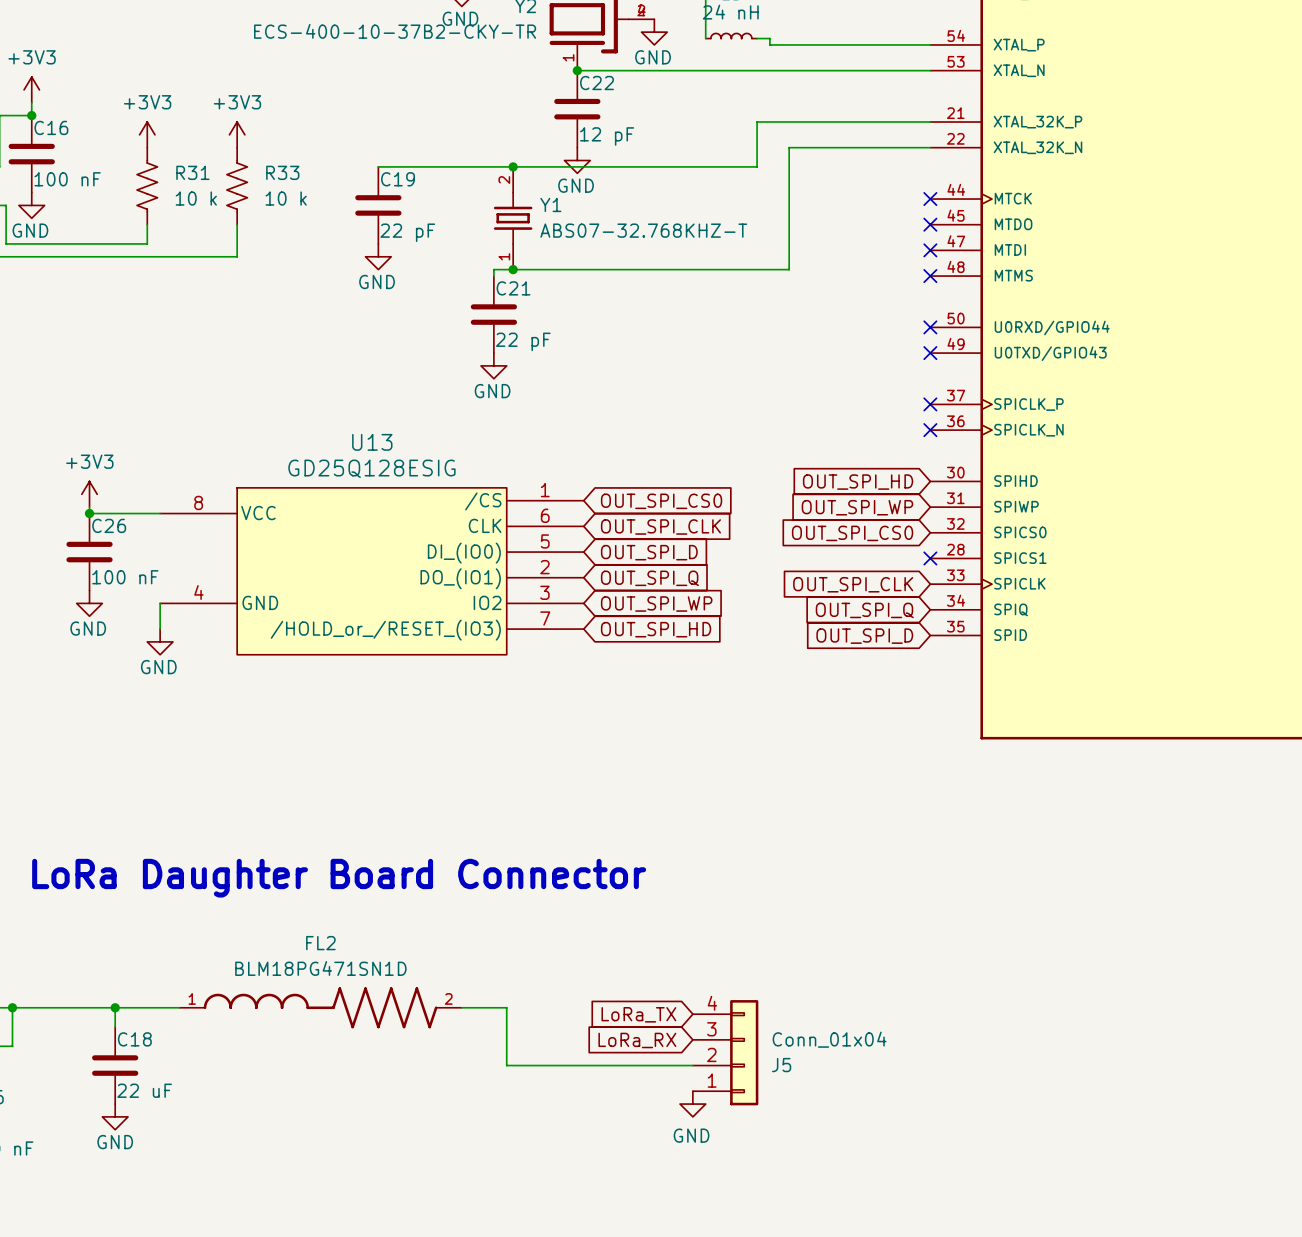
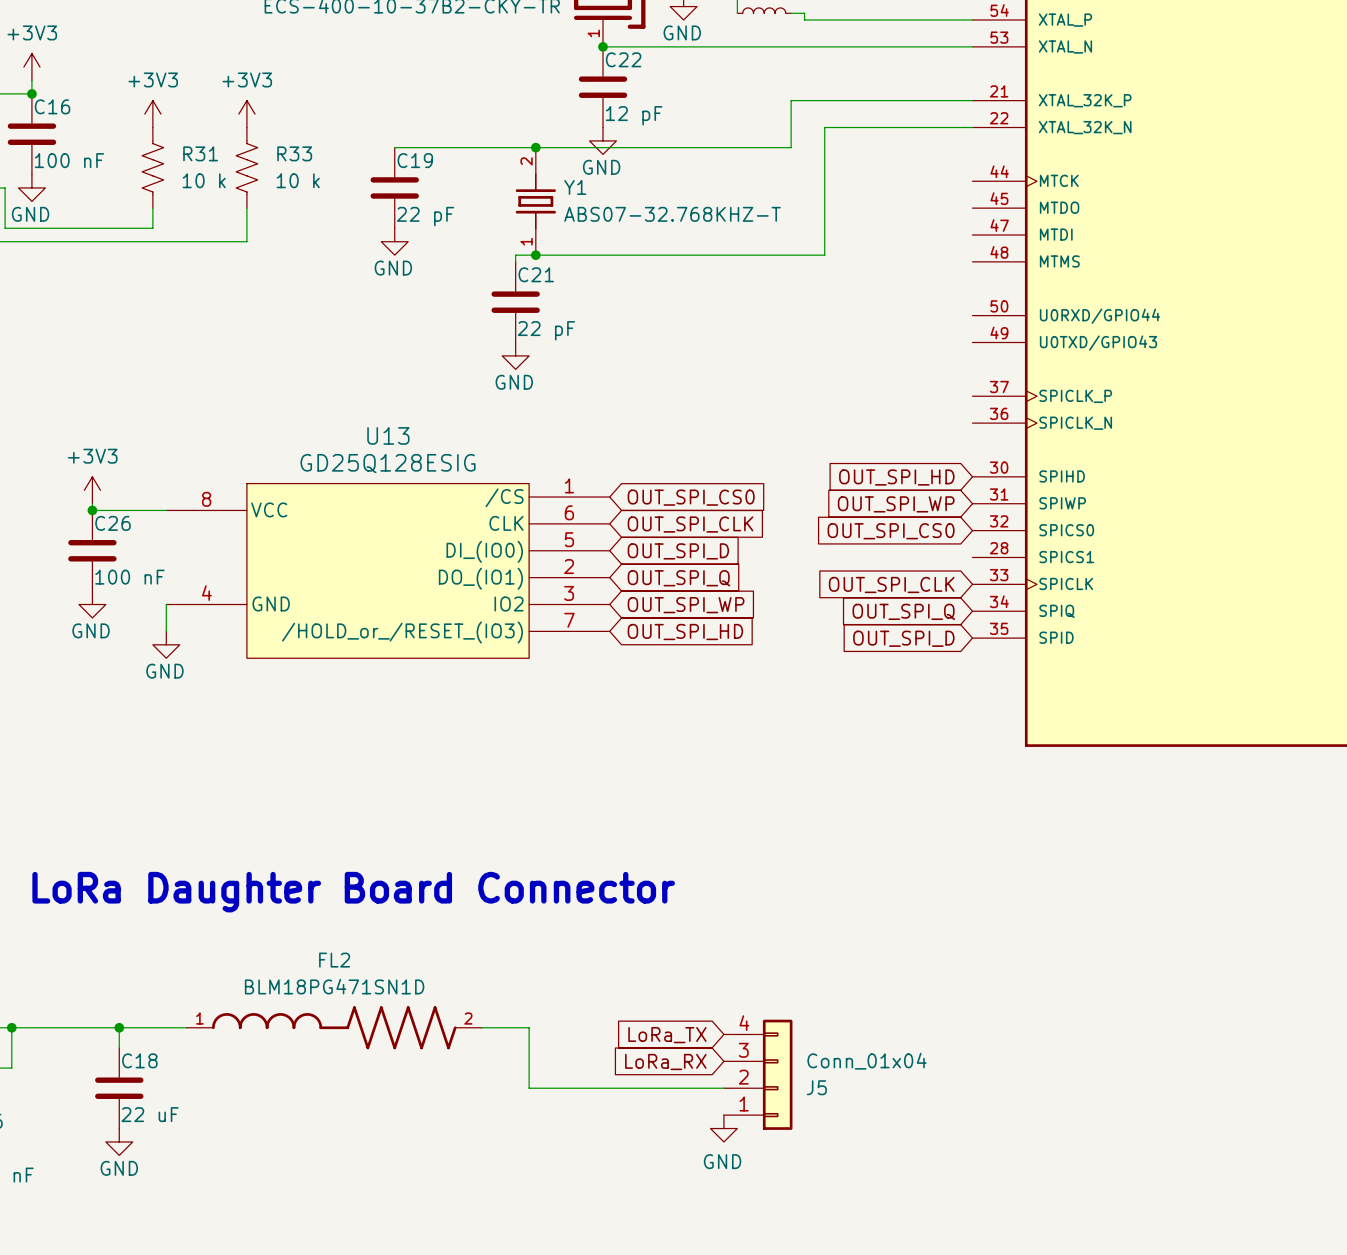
no-connect mark: (930, 199) -> none
no-connect mark: (930, 224) -> none
no-connect mark: (930, 250) -> none
no-connect mark: (930, 276) -> none
no-connect mark: (930, 327) -> none
no-connect mark: (930, 353) -> none
no-connect mark: (930, 404) -> none
no-connect mark: (930, 430) -> none
no-connect mark: (930, 558) -> none

